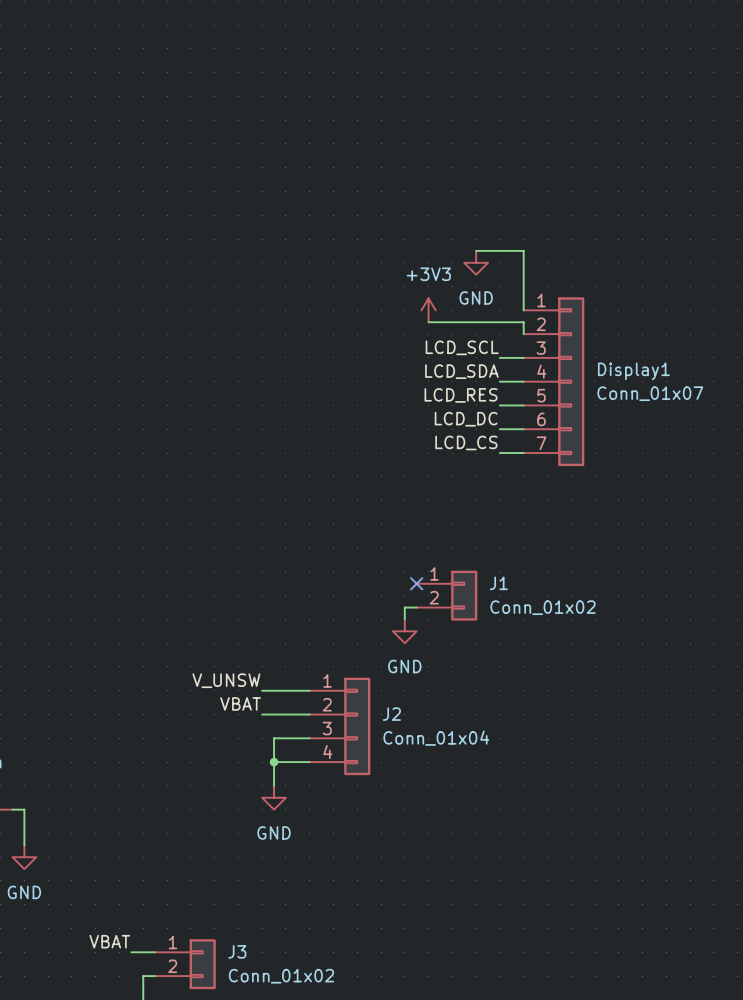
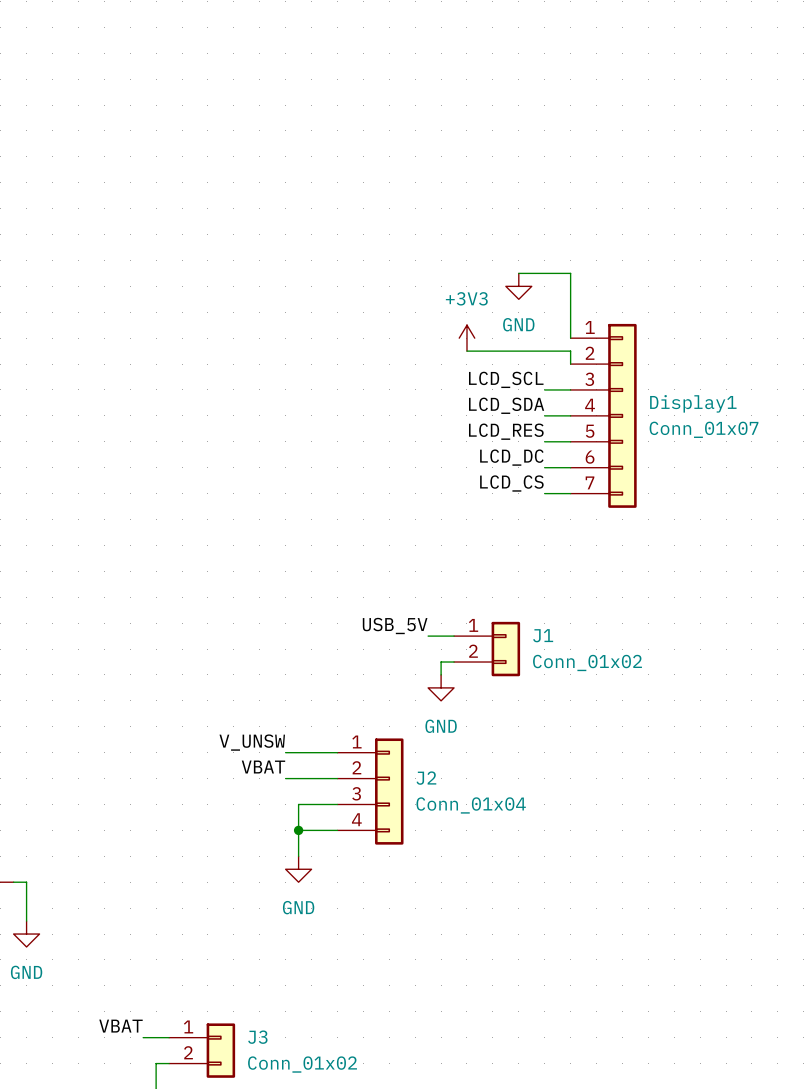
label: none -> USB_5V (395, 625)
wire: none -> (428, 636) (454, 636)
no-connect mark: (416, 583) -> none

